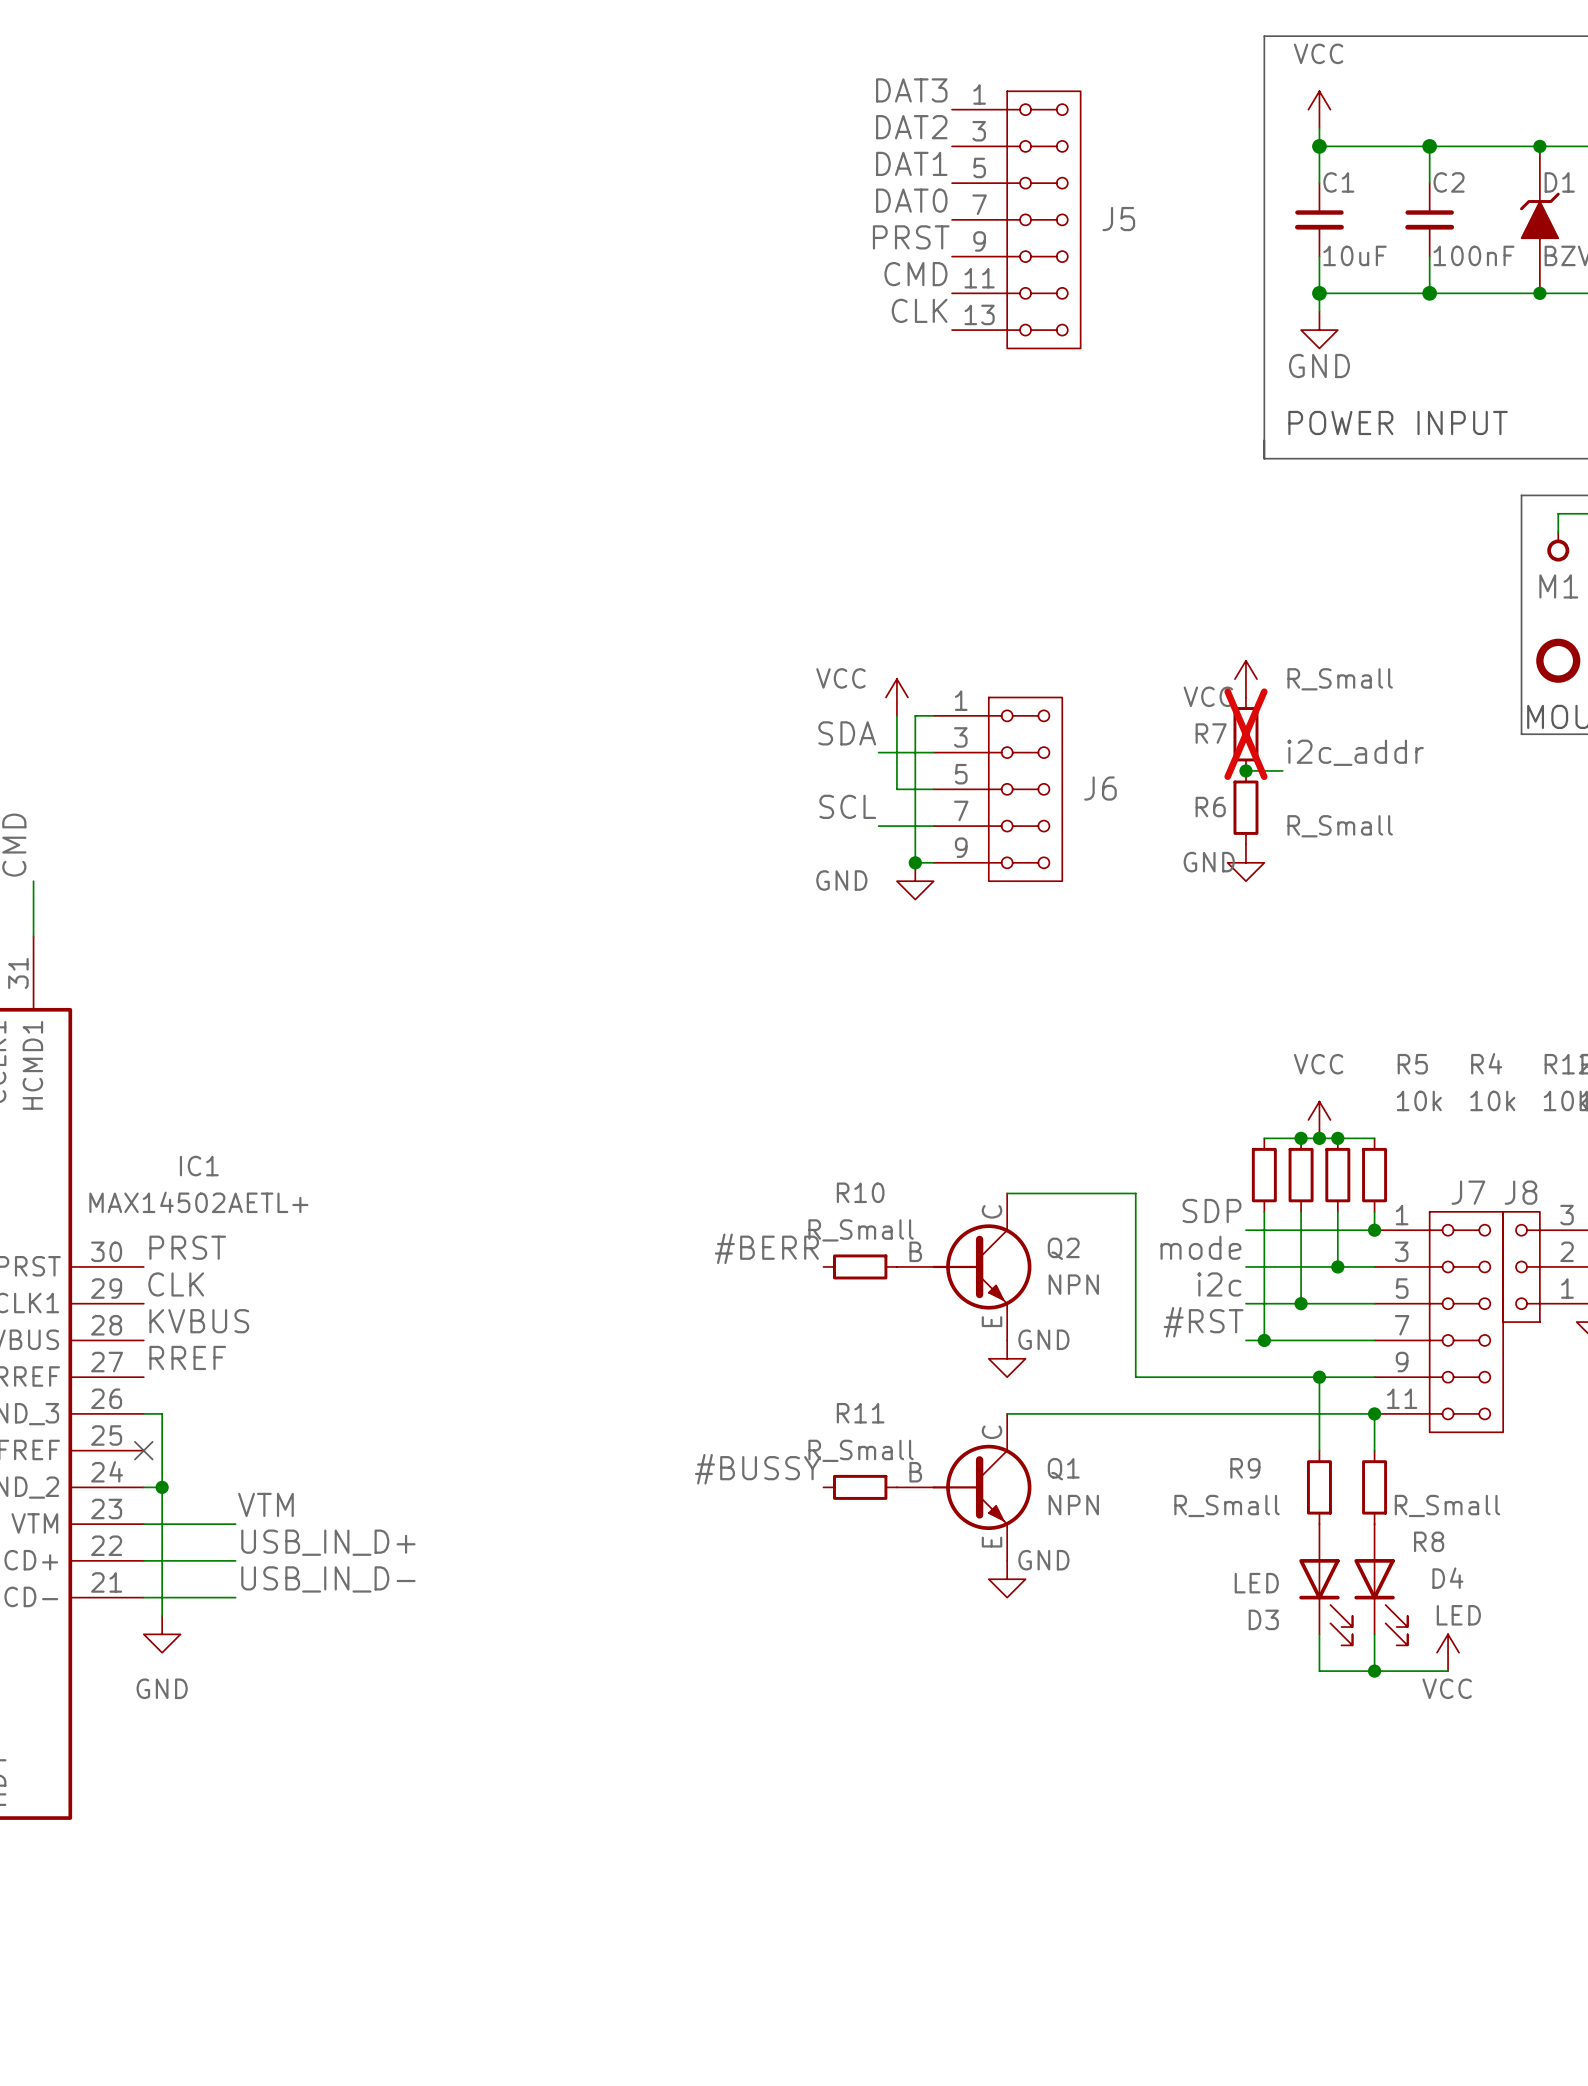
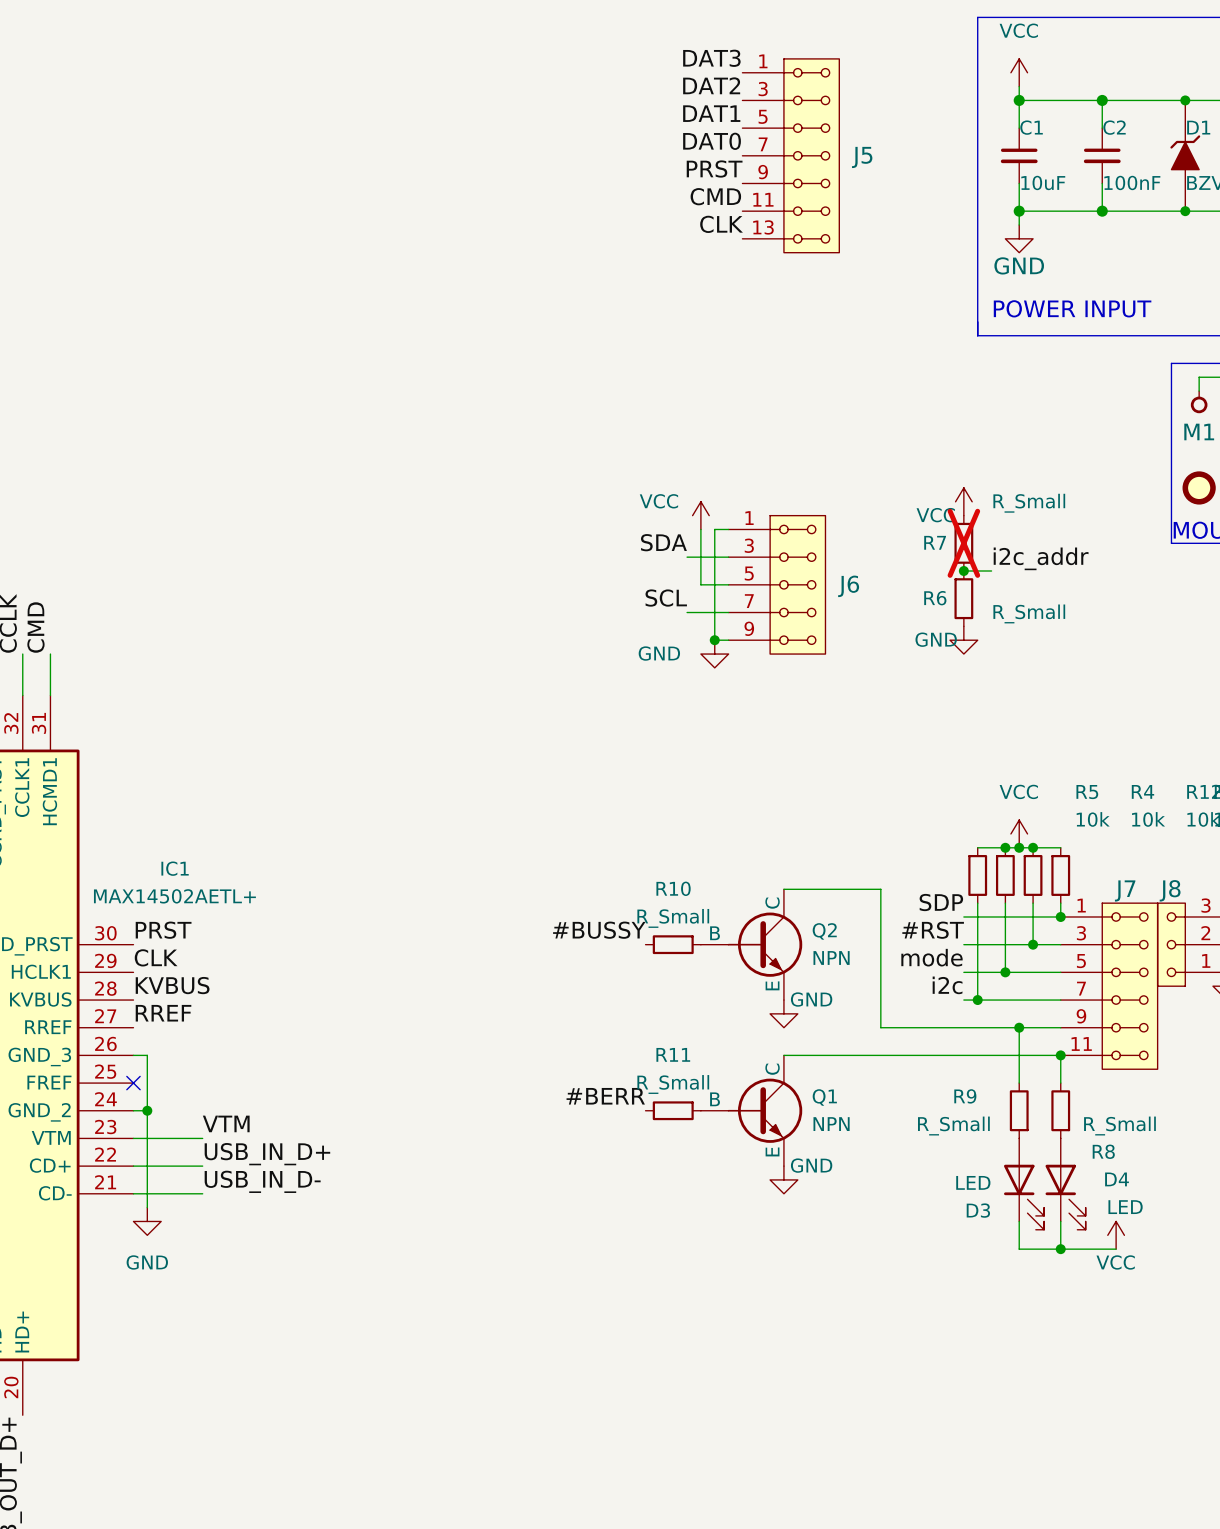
label: mode (1200, 1247) -> #RST (933, 930)
label: #BERR (766, 1248) -> #BUSSY (599, 930)
label: i2c (1219, 1284) -> mode (931, 957)
label: #RST (1203, 1322) -> i2c (947, 985)
label: #BUSSY (757, 1469) -> #BERR (605, 1096)

